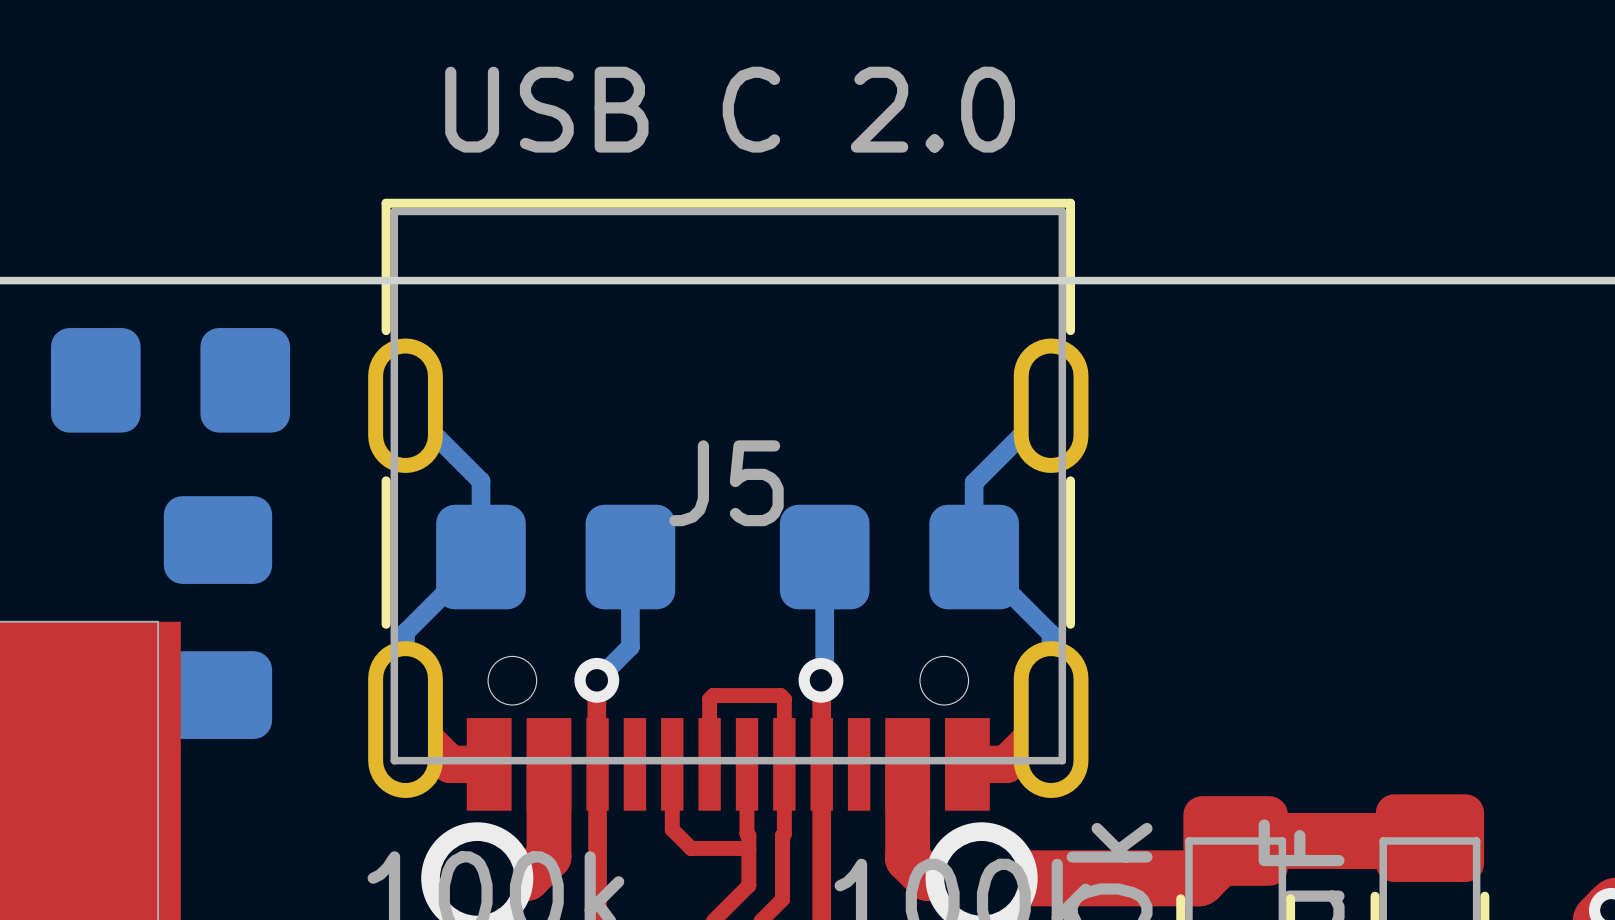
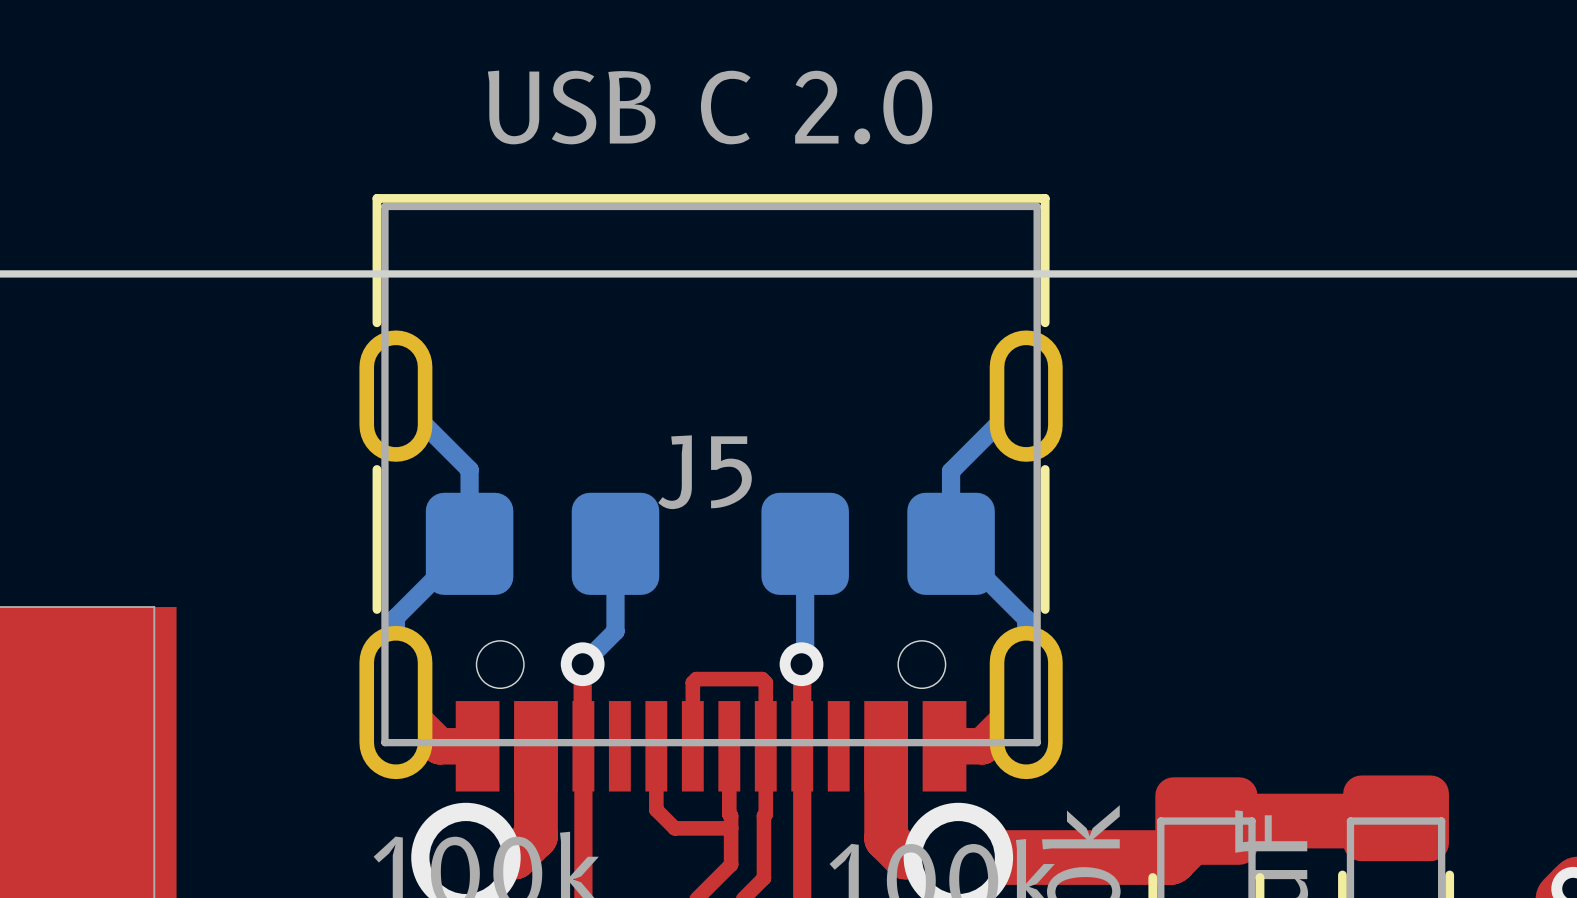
part: (170, 380) -> none
part: (217, 617) -> none

